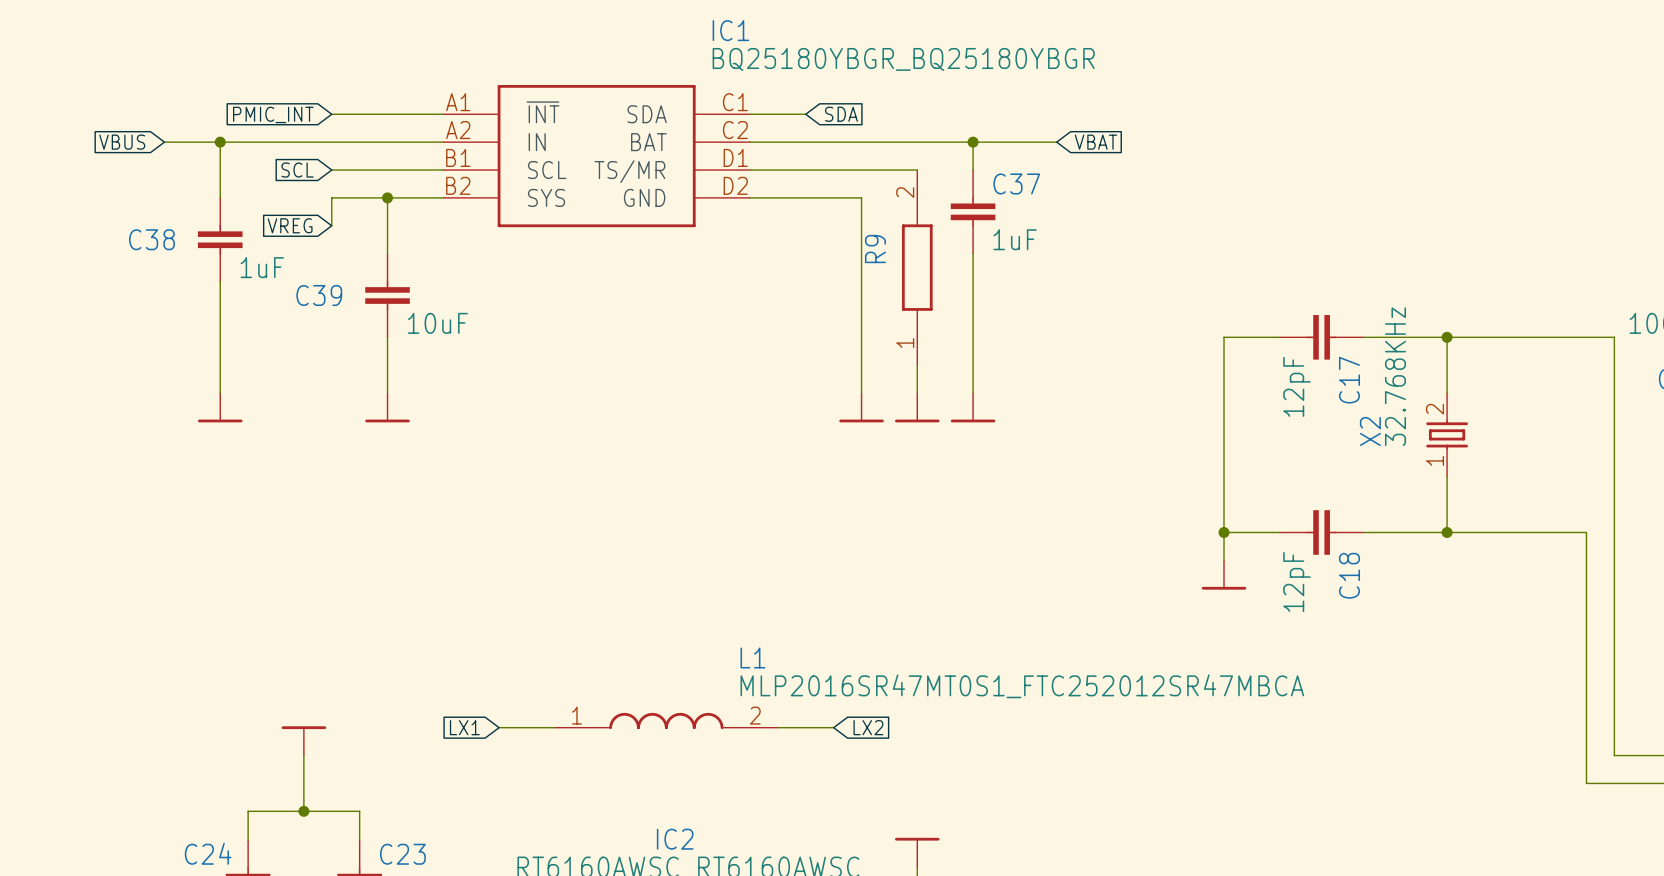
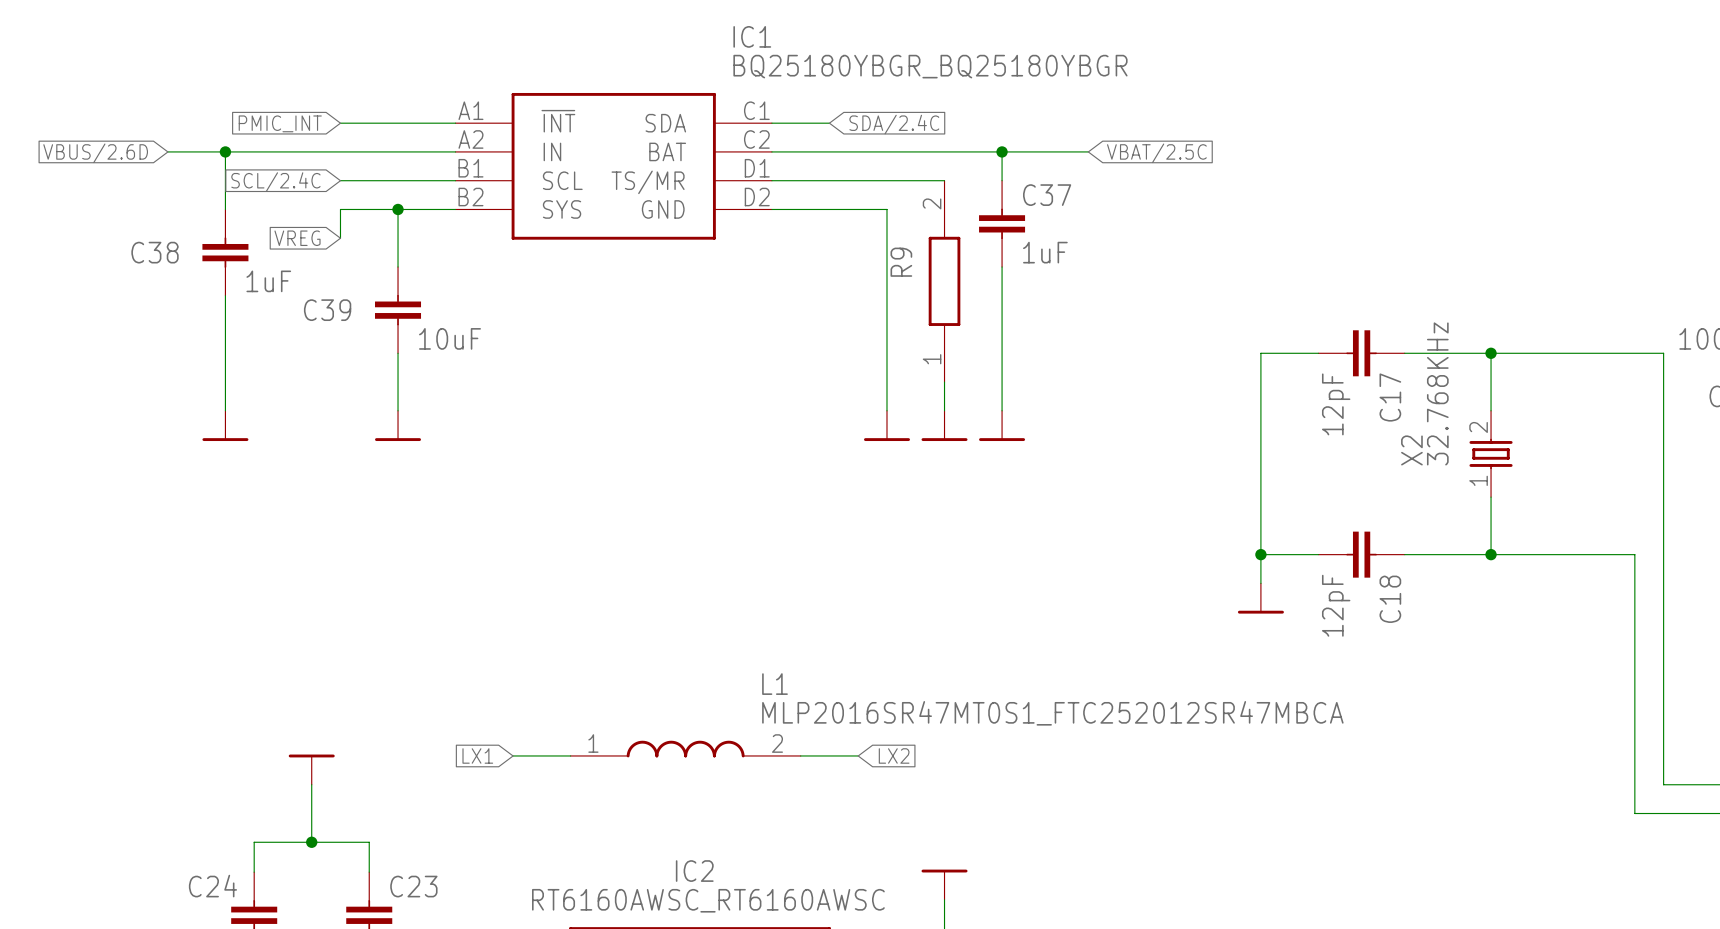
global label: SDA (841, 114) -> SDA/2.4C (894, 124)
global label: VBUS (122, 142) -> VBUS/2.6D (95, 153)
global label: VBAT (1095, 142) -> VBAT/2.5C (1156, 153)
global label: SCL (297, 170) -> SCL/2.4C (275, 182)

